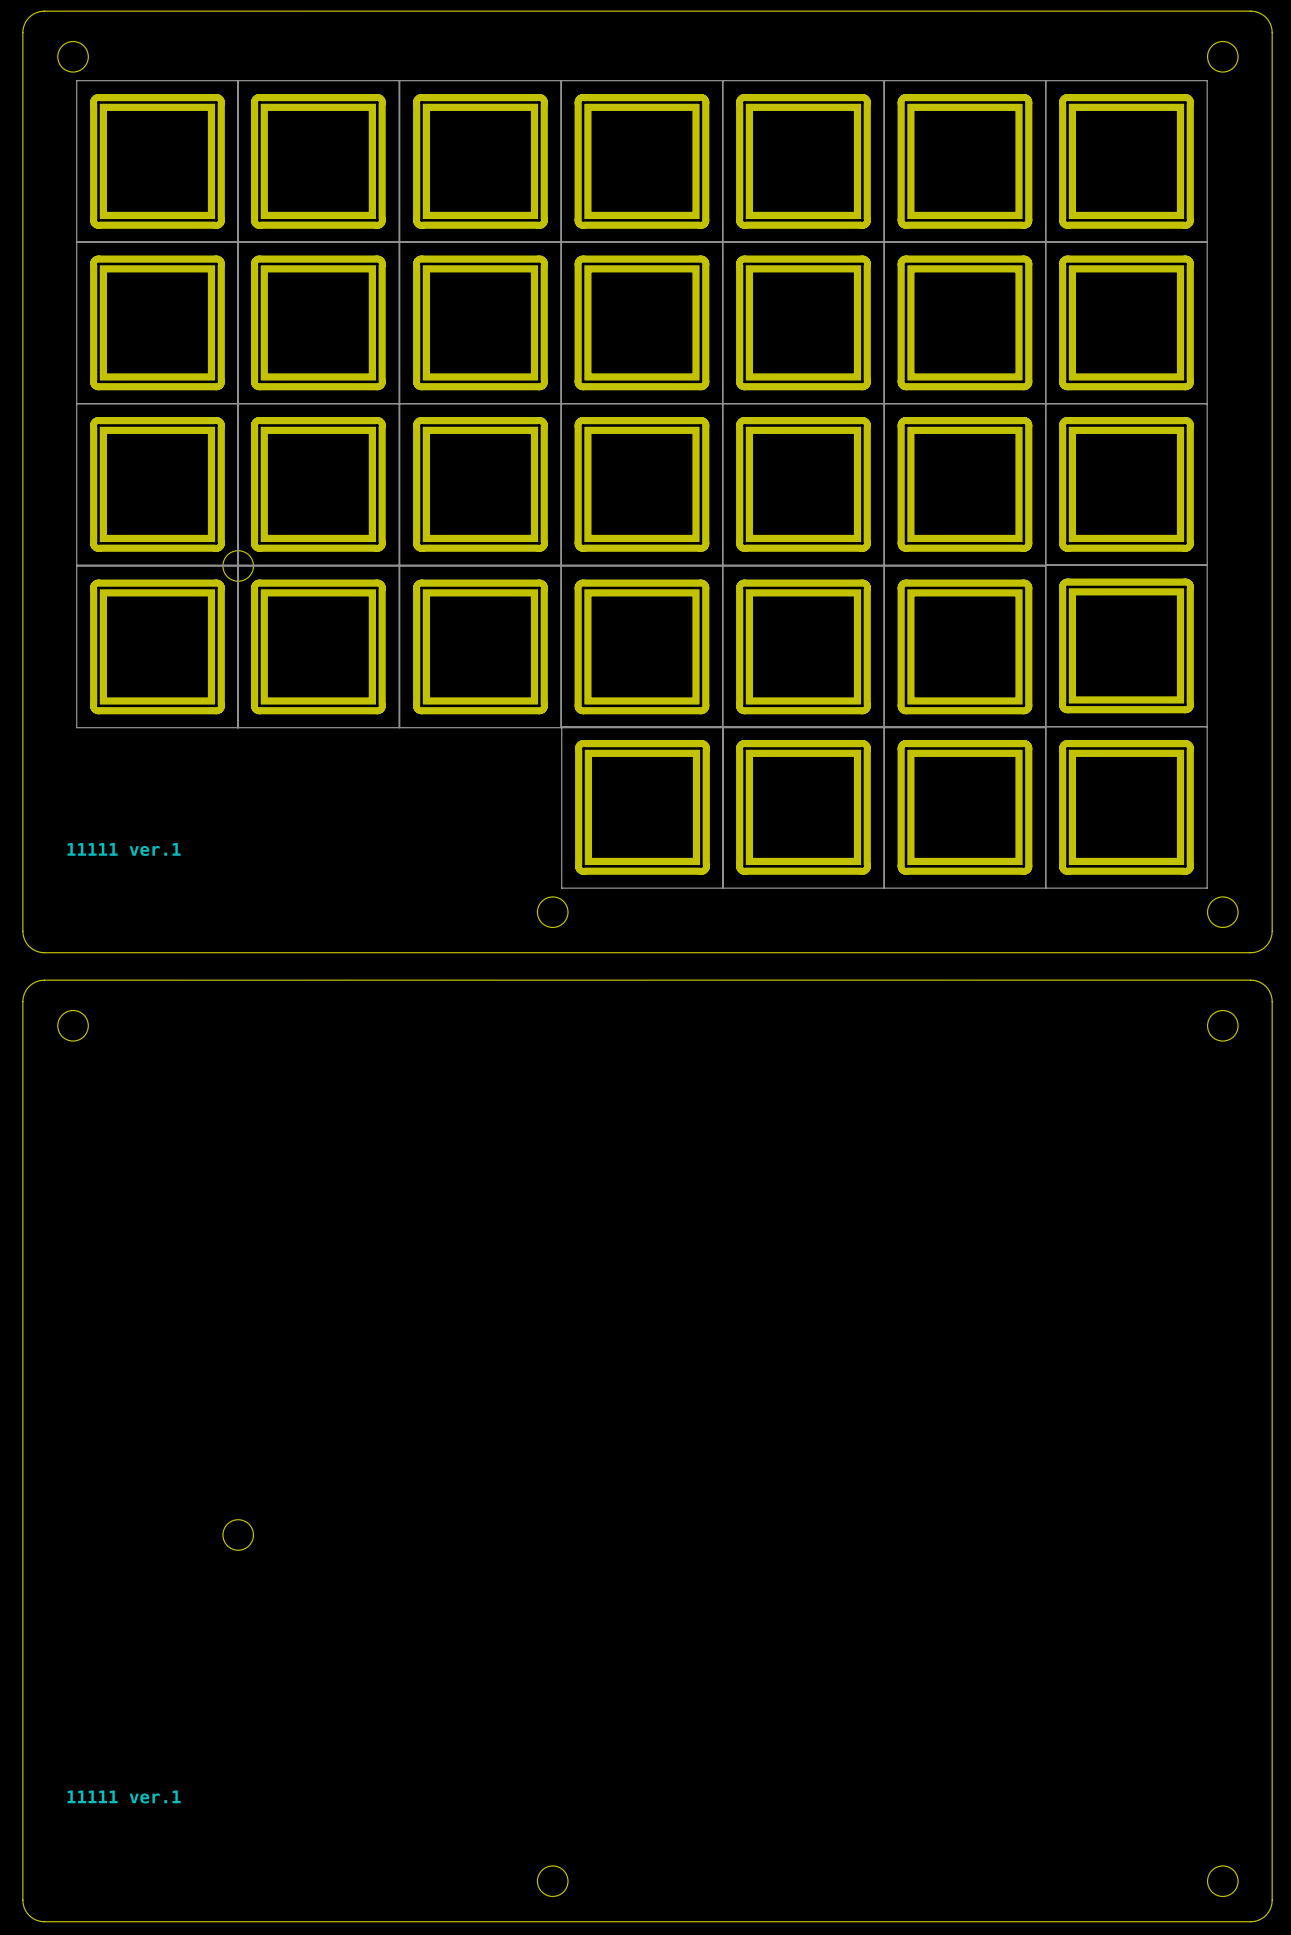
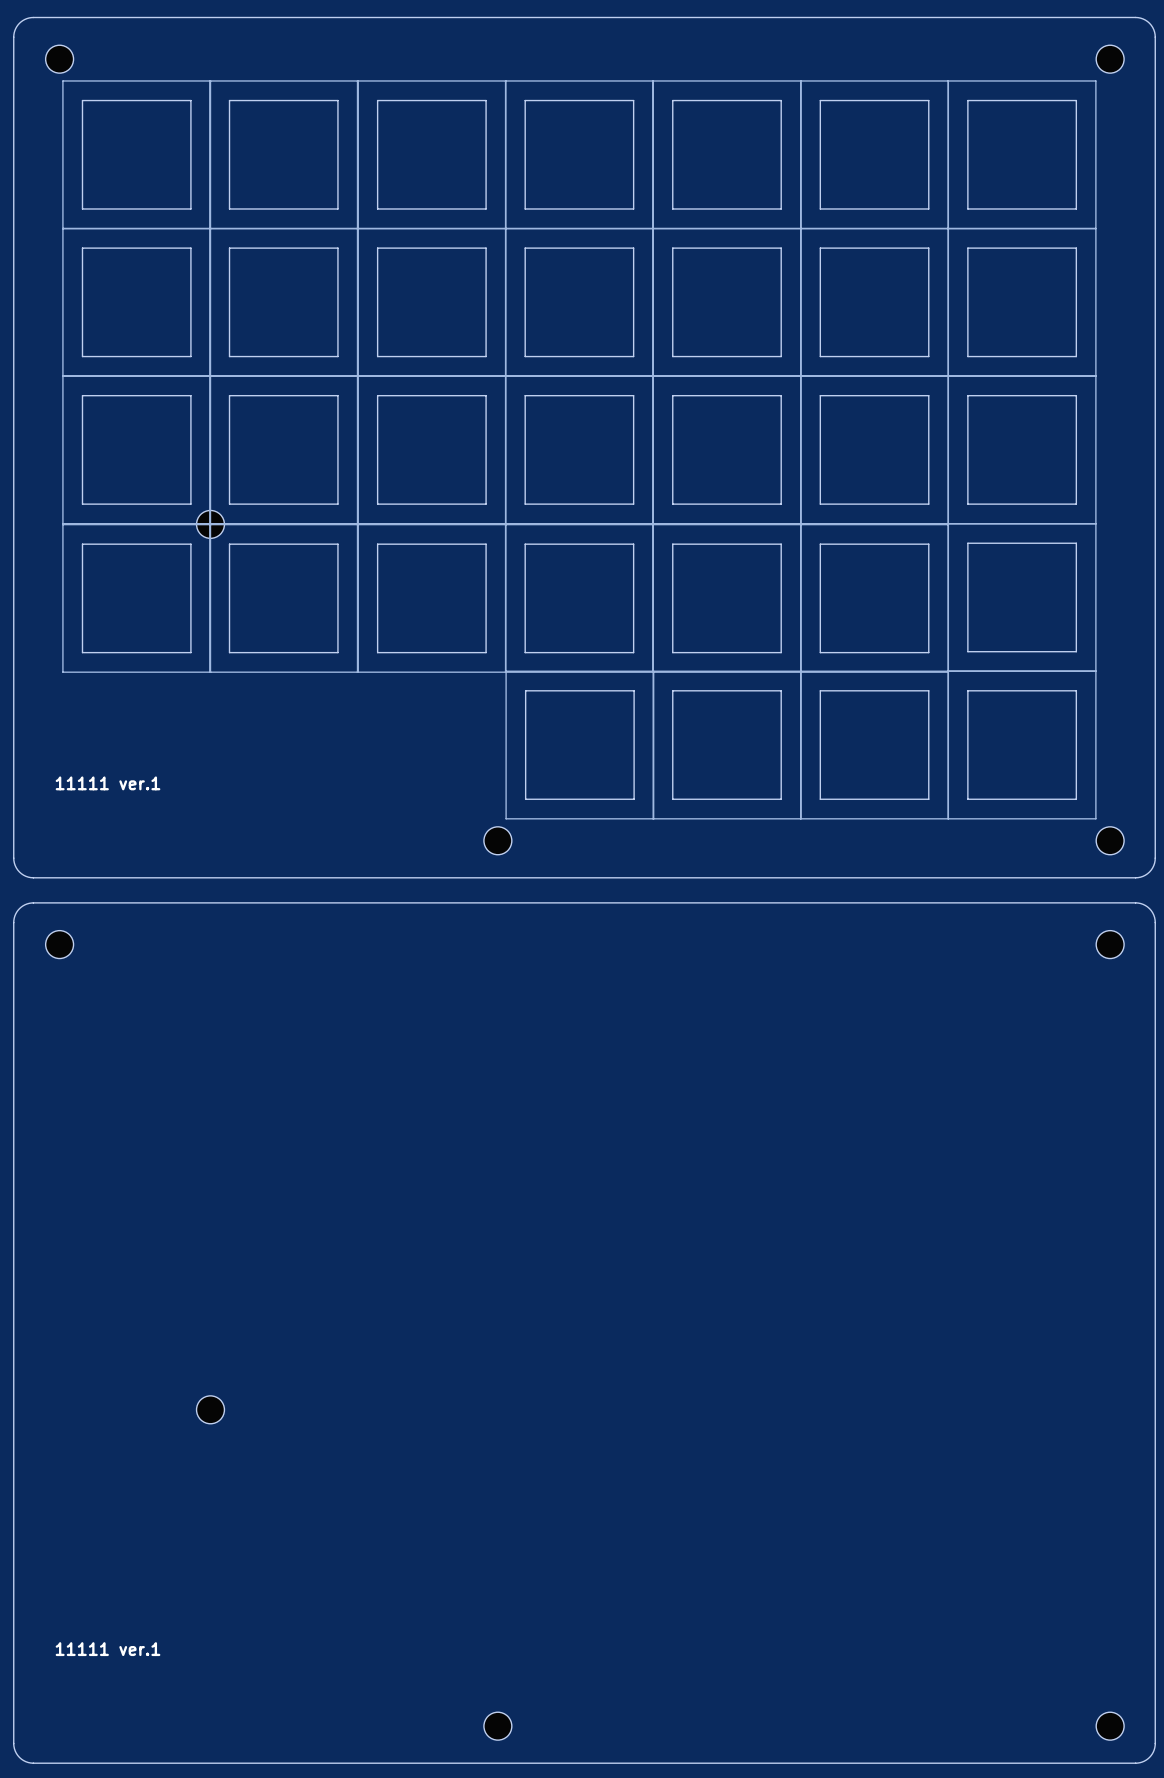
drawing: none -> [62, 80, 1097, 820]
part: (157, 161) -> none
part: (318, 161) -> none
part: (480, 161) -> none
part: (641, 161) -> none
part: (803, 161) -> none
part: (964, 161) -> none
part: (1126, 161) -> none
part: (157, 322) -> none
part: (318, 322) -> none
part: (480, 322) -> none
part: (641, 322) -> none
part: (803, 322) -> none
part: (964, 322) -> none
part: (1126, 322) -> none
part: (157, 484) -> none
part: (318, 484) -> none
part: (480, 484) -> none
part: (641, 484) -> none
part: (803, 484) -> none
part: (964, 484) -> none
part: (1126, 484) -> none
part: (1126, 645) -> none
part: (157, 646) -> none
part: (318, 646) -> none
part: (480, 646) -> none
part: (641, 646) -> none
part: (803, 646) -> none
part: (964, 646) -> none
part: (642, 807) -> none
part: (803, 807) -> none
part: (964, 807) -> none
part: (1126, 807) -> none

